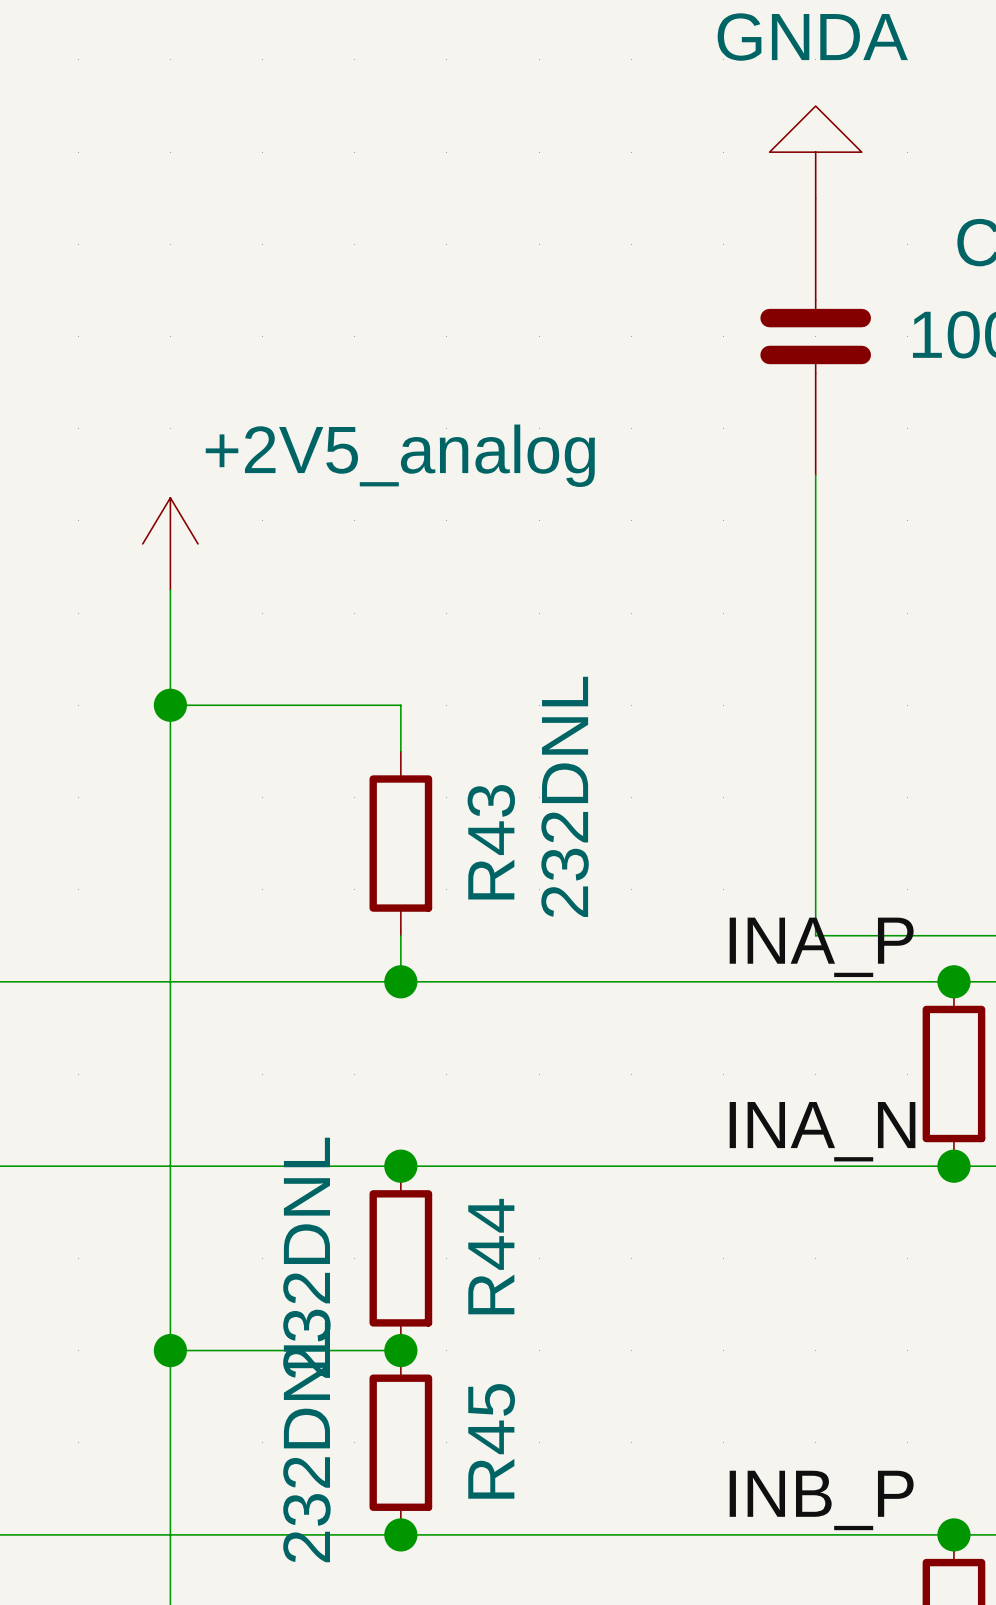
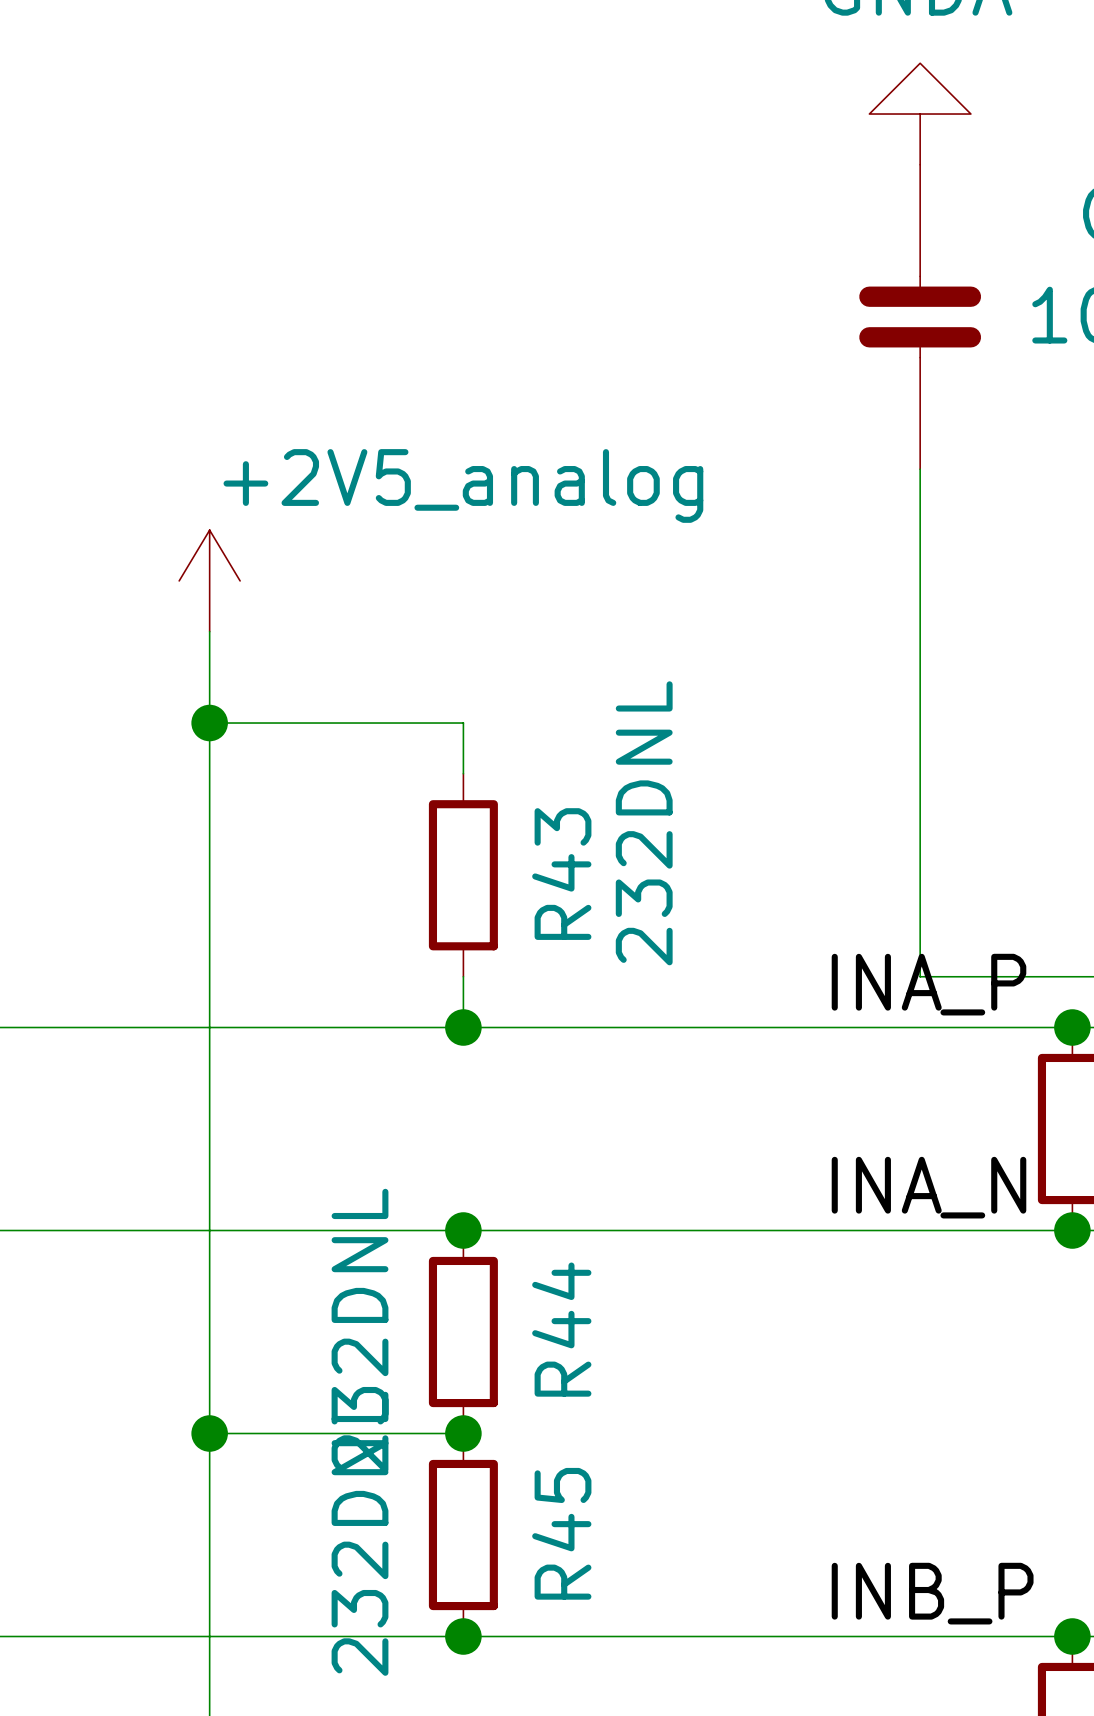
power symbol position: +2V5_analog (170, 543) -> +2V5_analog (209, 580)

